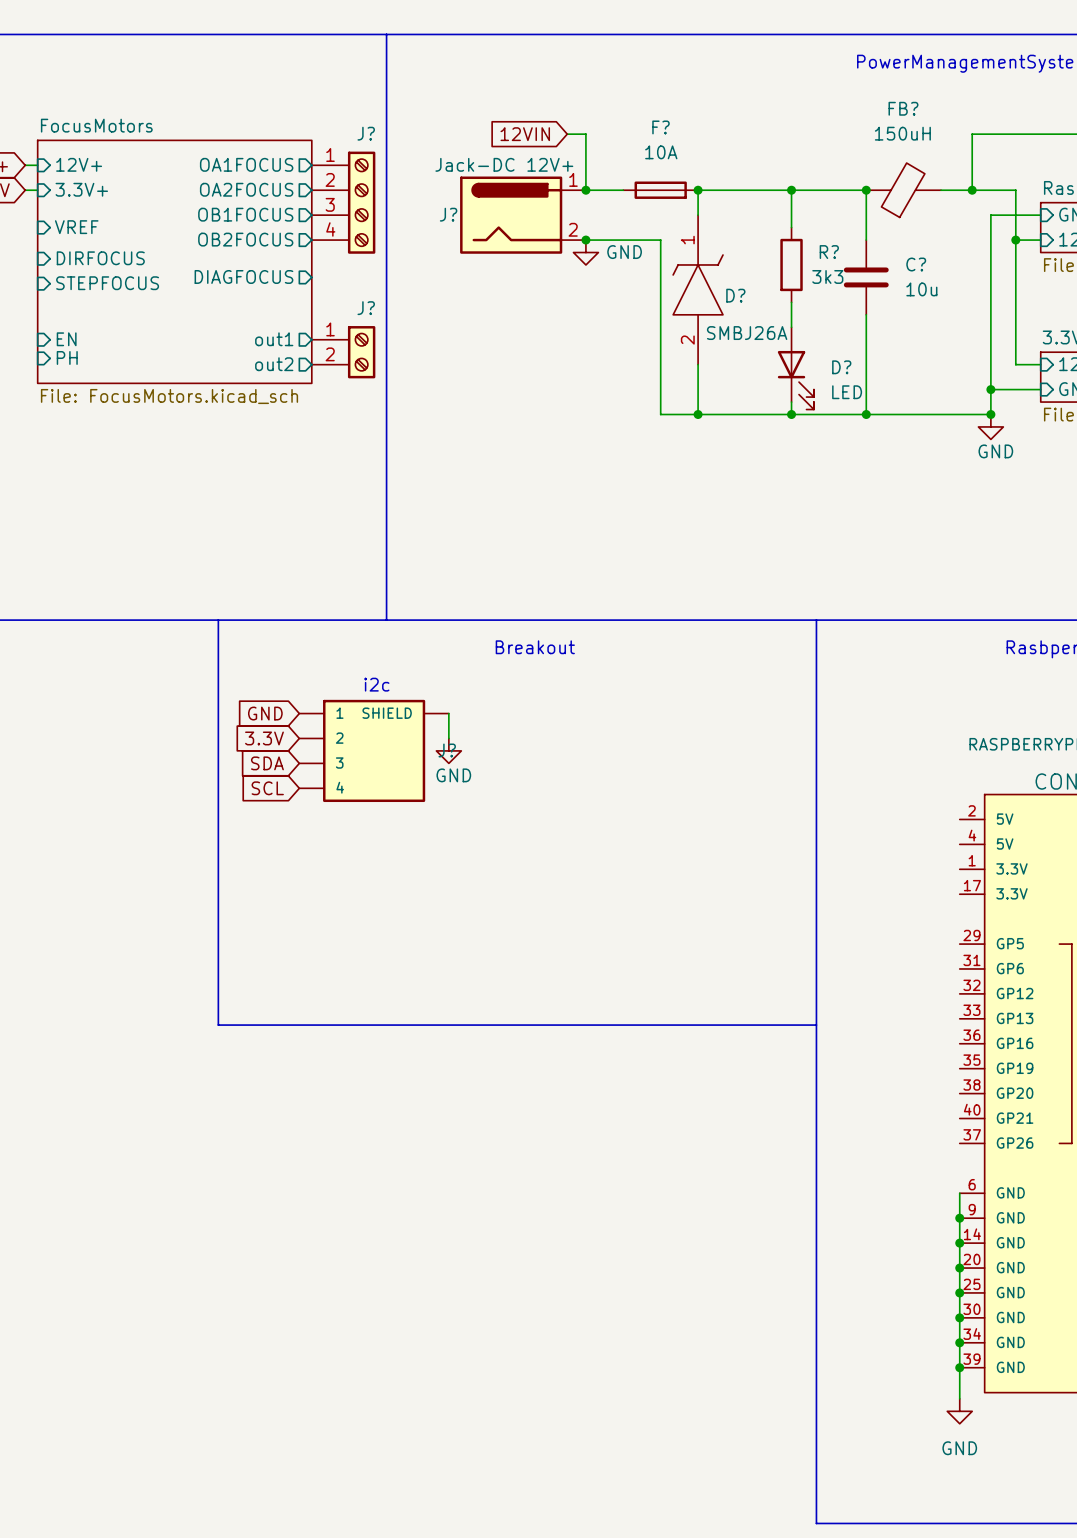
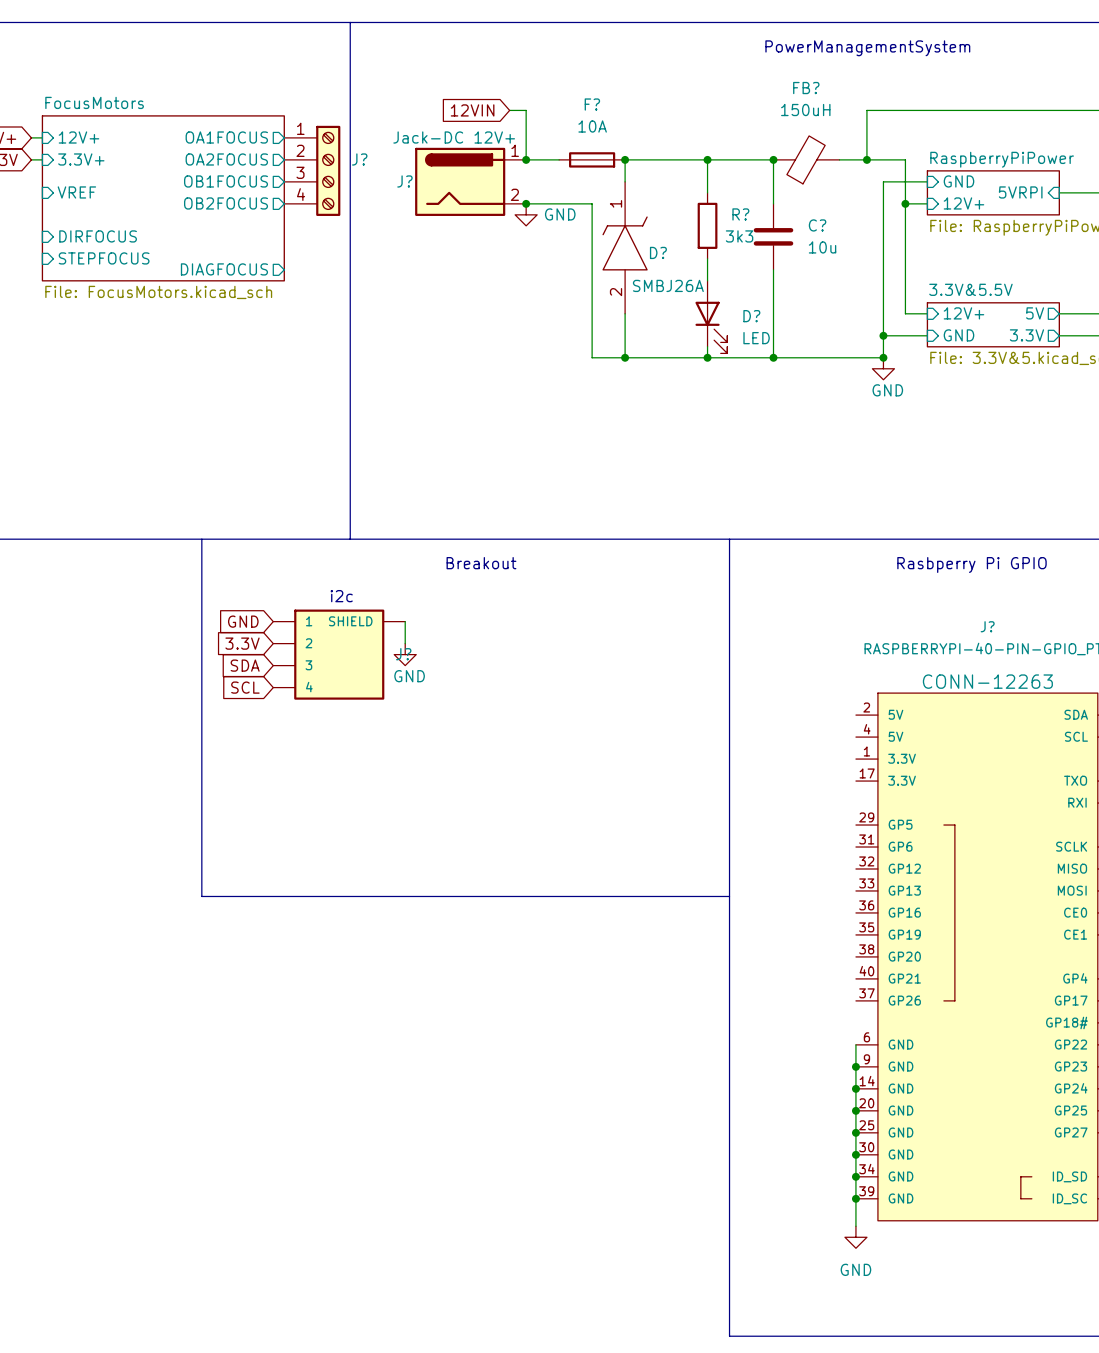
J? name position: J? (366, 133) -> J? (359, 159)
sheet FocusMotors: none -> File: FocusMotors.kicad_sch (163, 198)
sheet pin: DIRFOCUS (100, 258) -> none
sheet FocusMotors: File: FocusMotors.kicad_sch (174, 261) -> none
sheet pin position: DIAGFOCUS (243, 276) -> DIAGFOCUS (224, 269)
sheet pin: STEPFOCUS (107, 283) -> DIRFOCUS (98, 236)
sheet pin: none -> STEPFOCUS (104, 258)
sheet pin: EN (66, 339) -> none
sheet pin: out1 (274, 339) -> none
J?: (343, 352) -> none
sheet pin: PH (67, 357) -> none
sheet pin: out2 (274, 364) -> none

